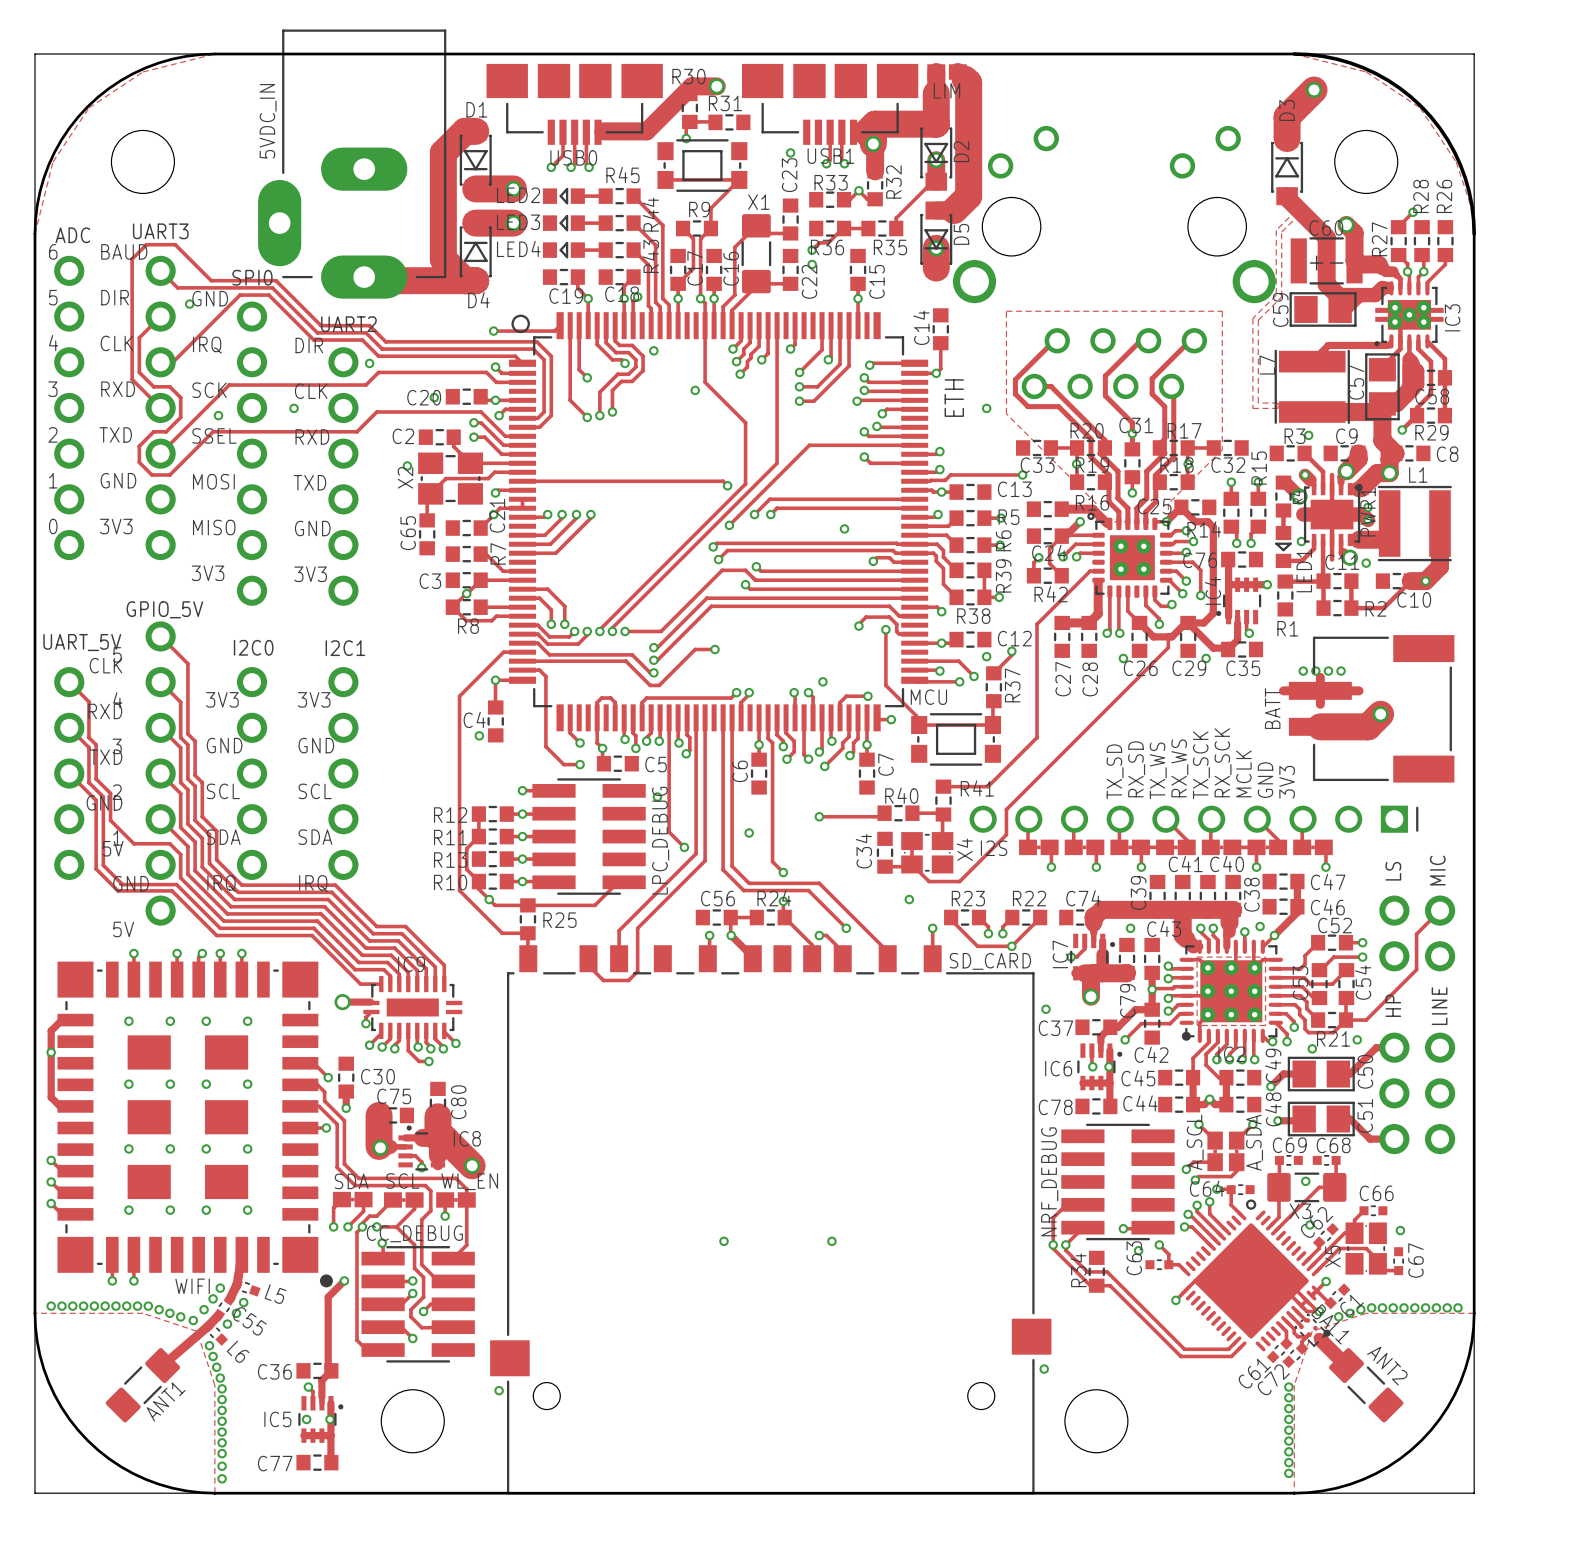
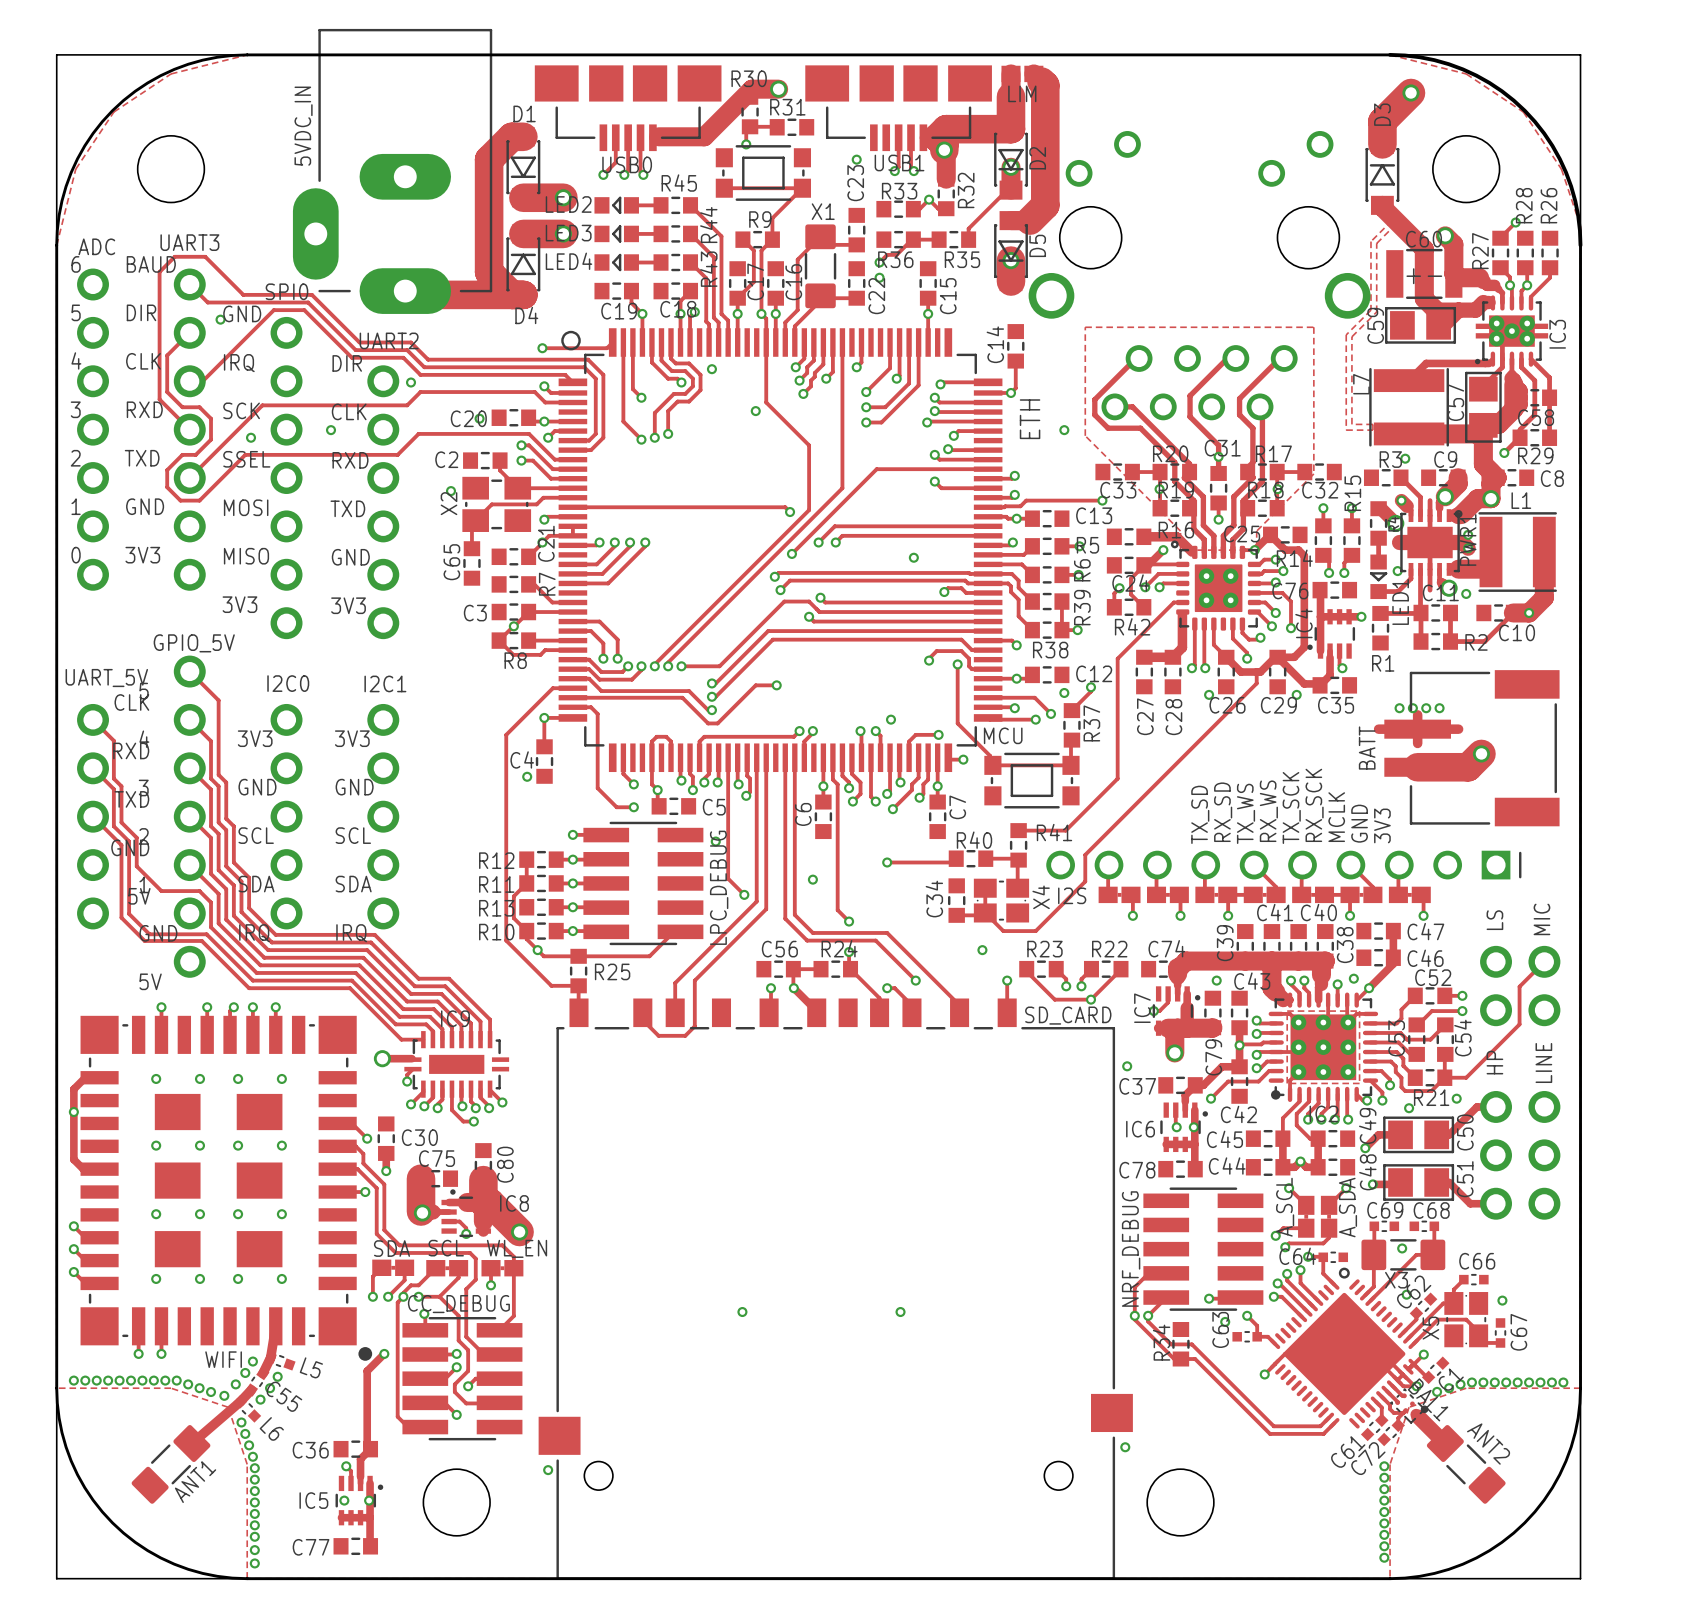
via position: (724, 1241) -> (742, 1312)

